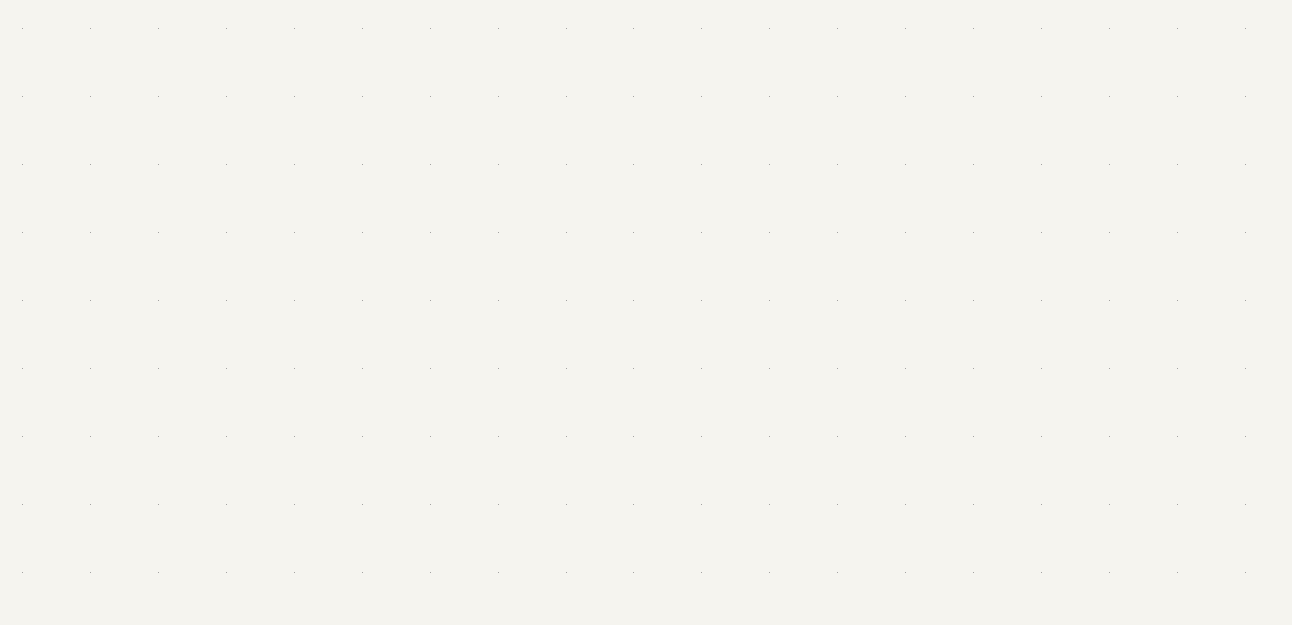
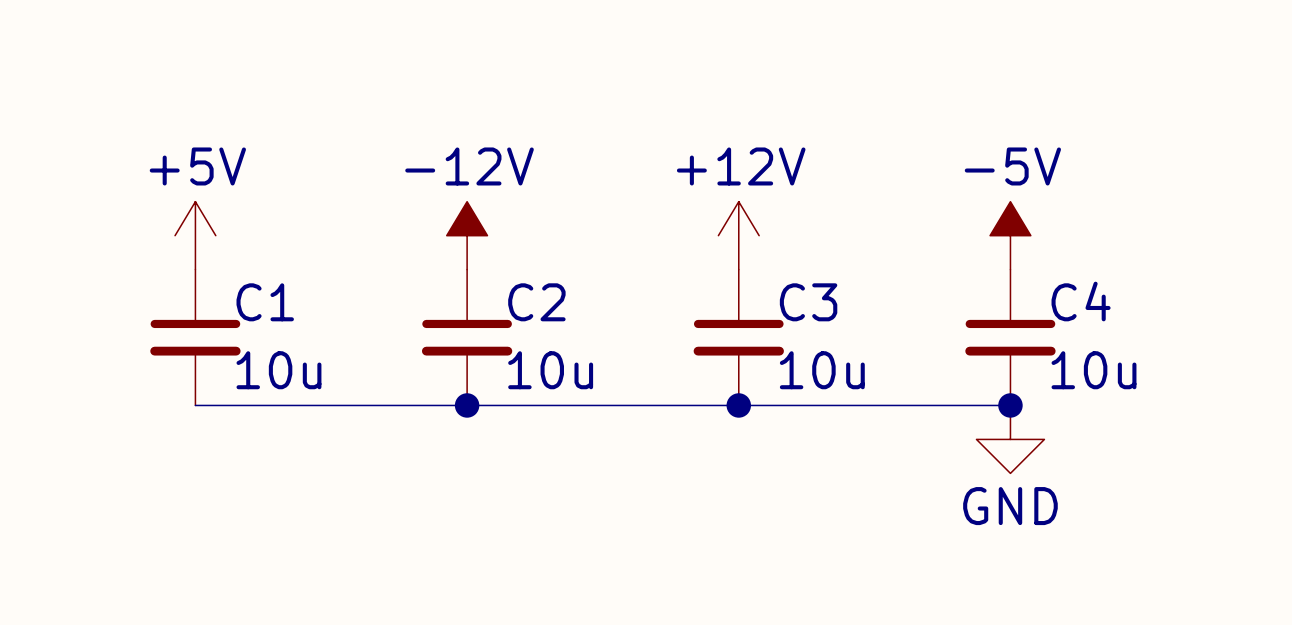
power symbol: none -> +5V (195, 235)
power symbol: none -> -12V (467, 235)
power symbol: none -> +12V (738, 235)
power symbol: none -> -5V (1010, 235)
C1: none -> 10u (195, 337)
C2: none -> 10u (467, 337)
C3: none -> 10u (738, 337)
C4: none -> 10u (1010, 337)
wire: none -> (195, 405) (1010, 405)
junction: none -> (467, 405)
junction: none -> (738, 405)
junction: none -> (1010, 405)
power symbol: none -> GND (1010, 439)

